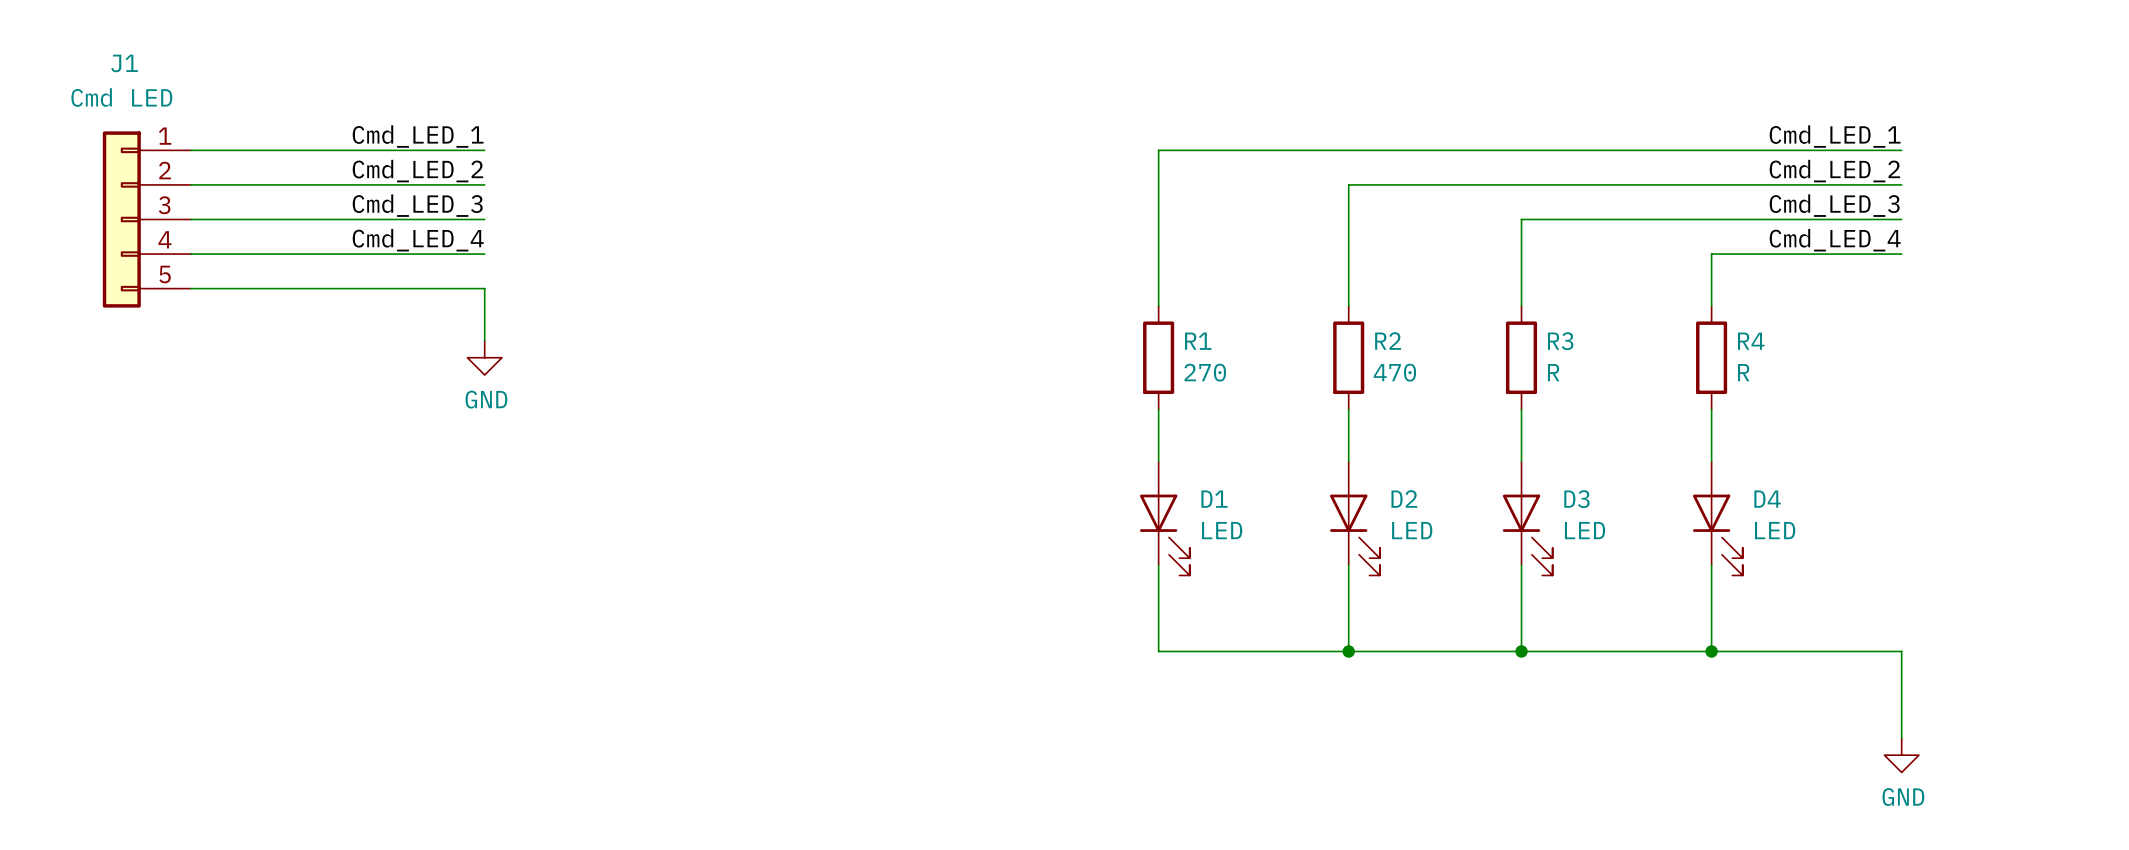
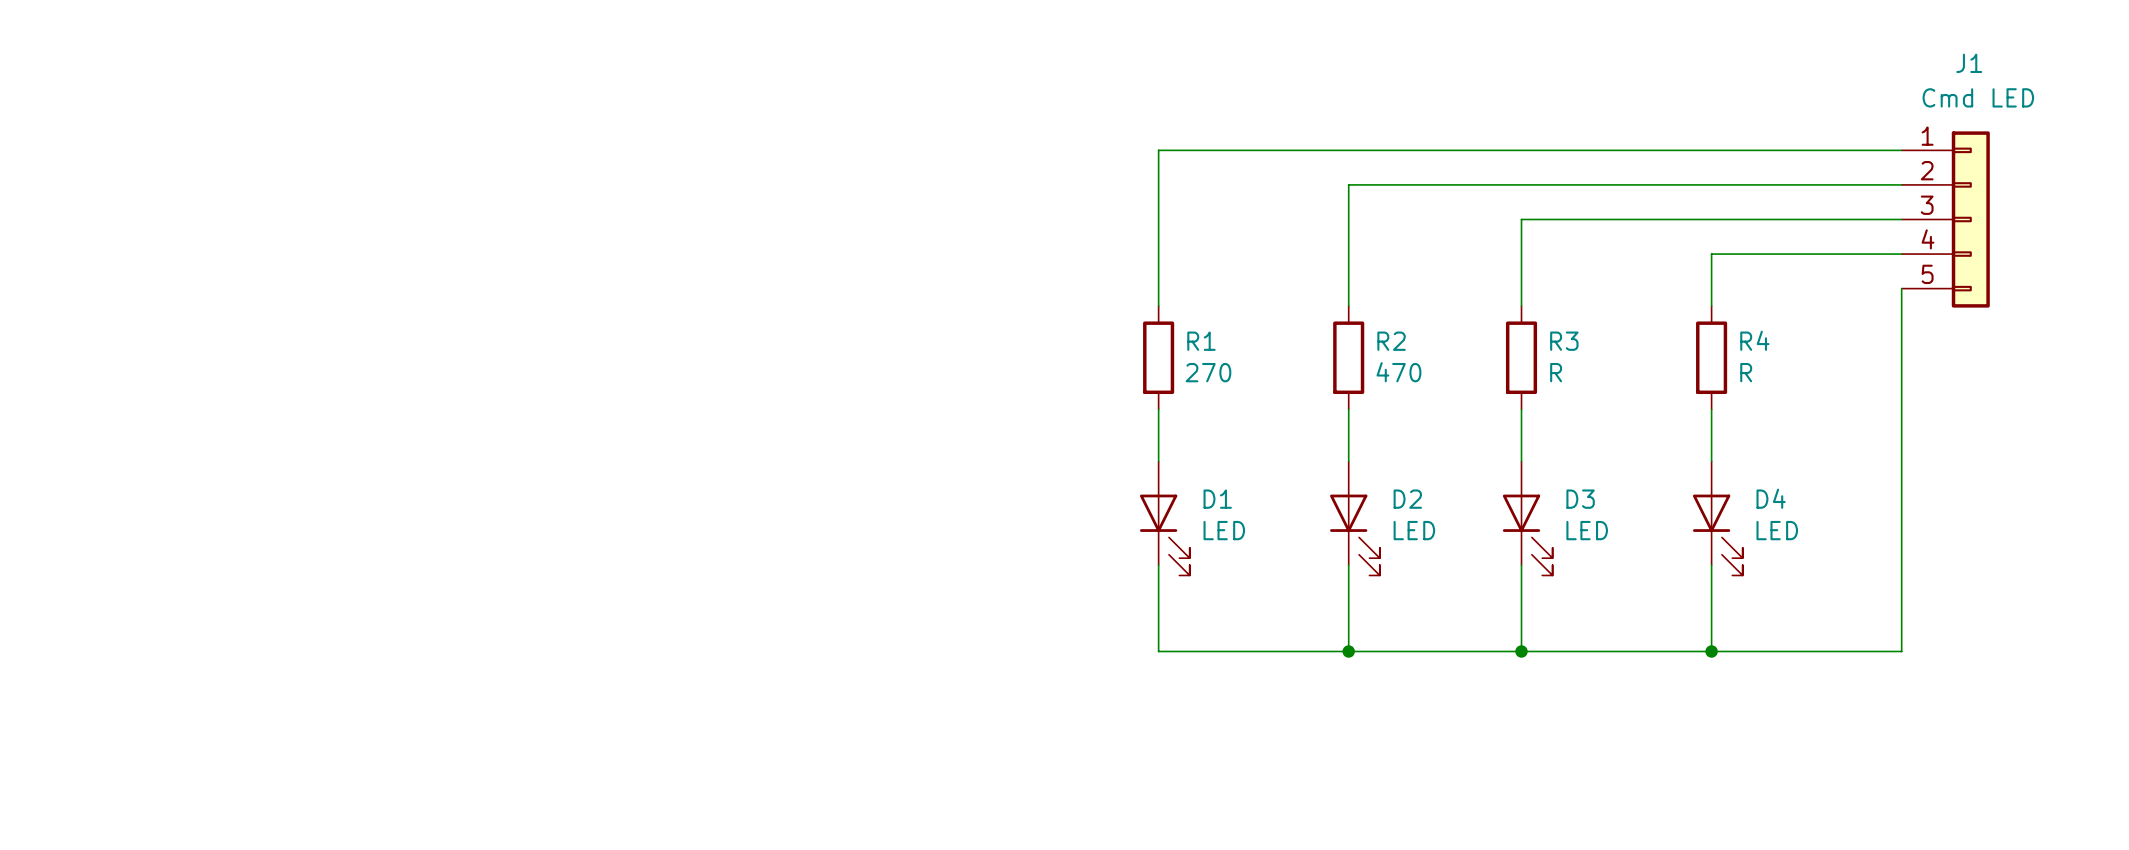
label: Cmd_LED_1 (418, 136) -> none
label: Cmd_LED_1 (1835, 136) -> none
wire: (190, 150) (484, 150) -> none
label: Cmd_LED_2 (417, 171) -> none
label: Cmd_LED_2 (1834, 171) -> none
wire: (190, 184) (484, 184) -> none
label: Cmd_LED_3 (417, 205) -> none
label: Cmd_LED_3 (1834, 205) -> none
J1 flip: as is (121, 219) -> left-right (1970, 219)
J1 position: (146, 219) -> (1945, 219)
wire: (190, 219) (484, 219) -> none
label: Cmd_LED_4 (418, 240) -> none
label: Cmd_LED_4 (1835, 240) -> none
wire: (190, 254) (484, 254) -> none
wire: (190, 288) (484, 288) (484, 340) -> none
power symbol: GND (484, 357) -> none
wire: (1901, 651) (1901, 737) -> (1901, 651) (1901, 288)
power symbol: GND (1901, 755) -> none

